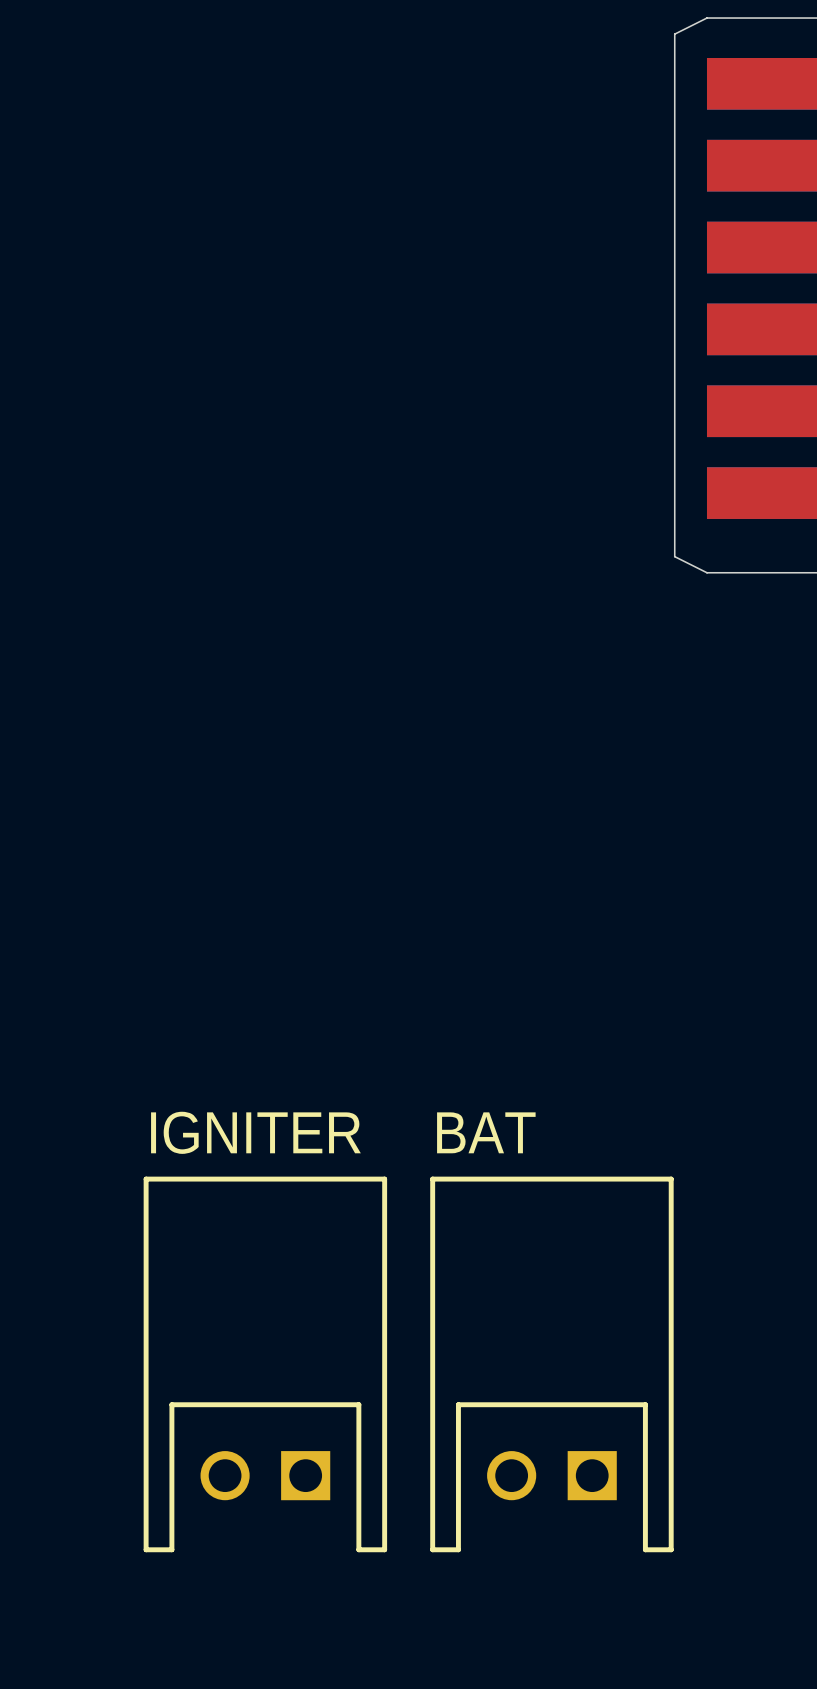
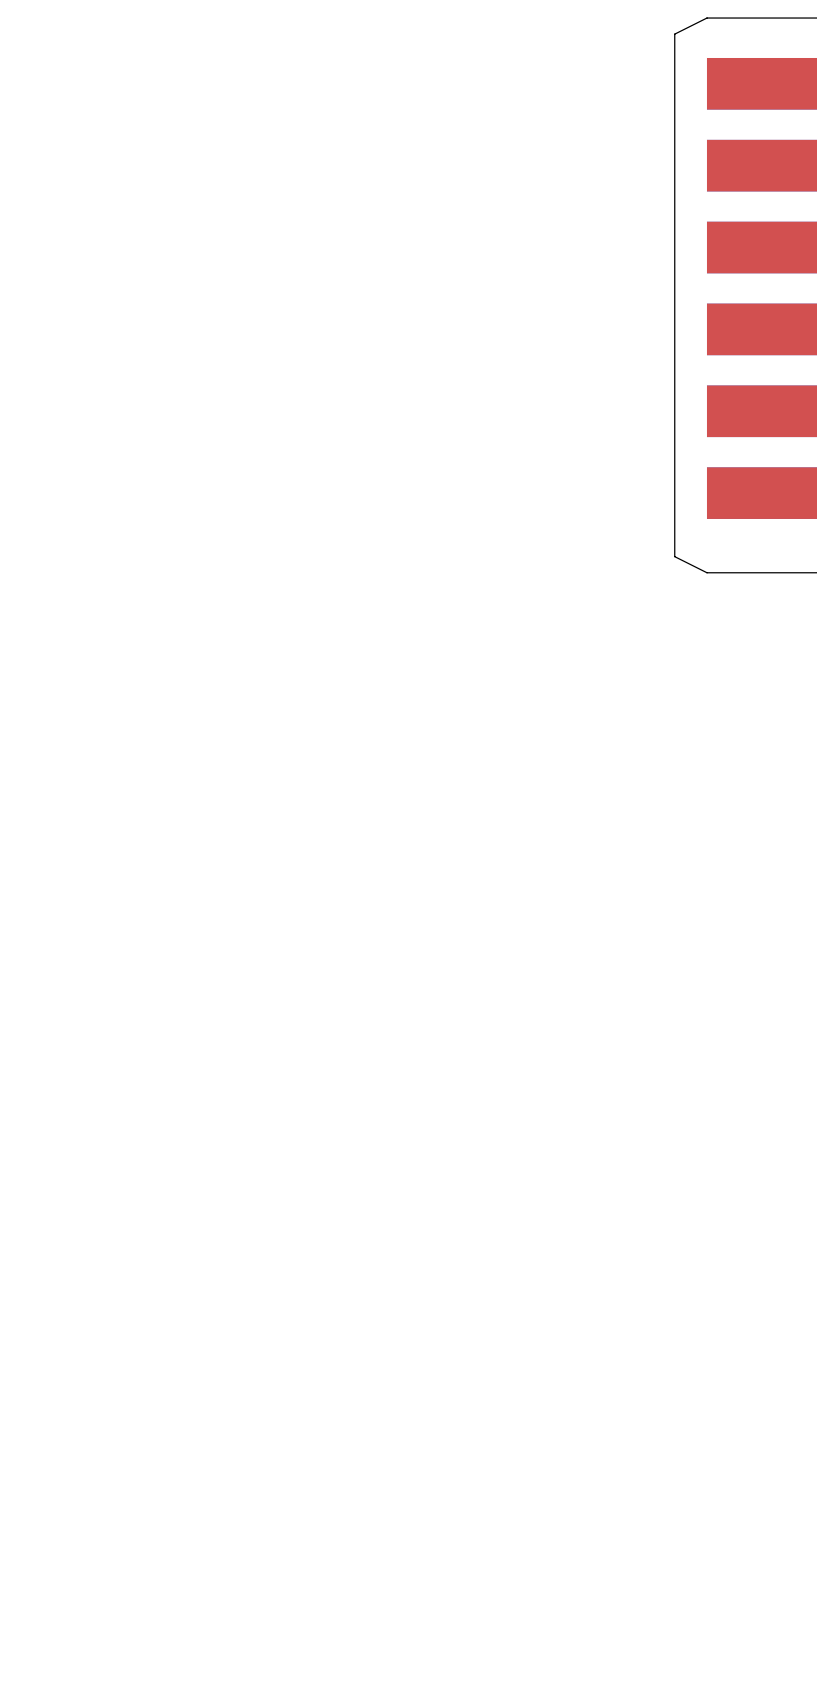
IGNITER: (265, 1364) -> none
BAT: (551, 1364) -> none

